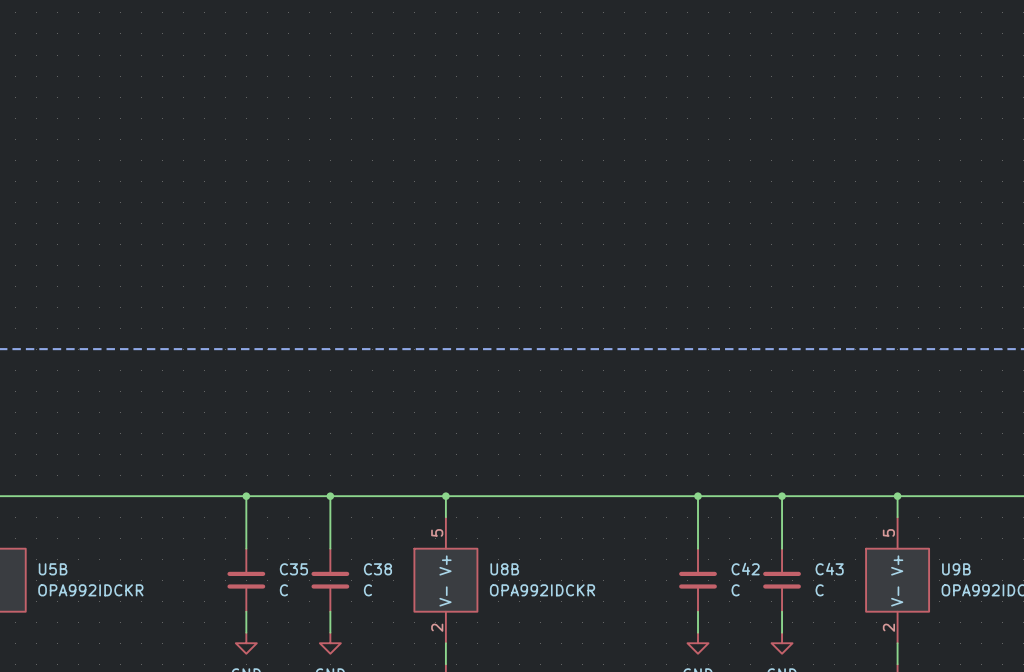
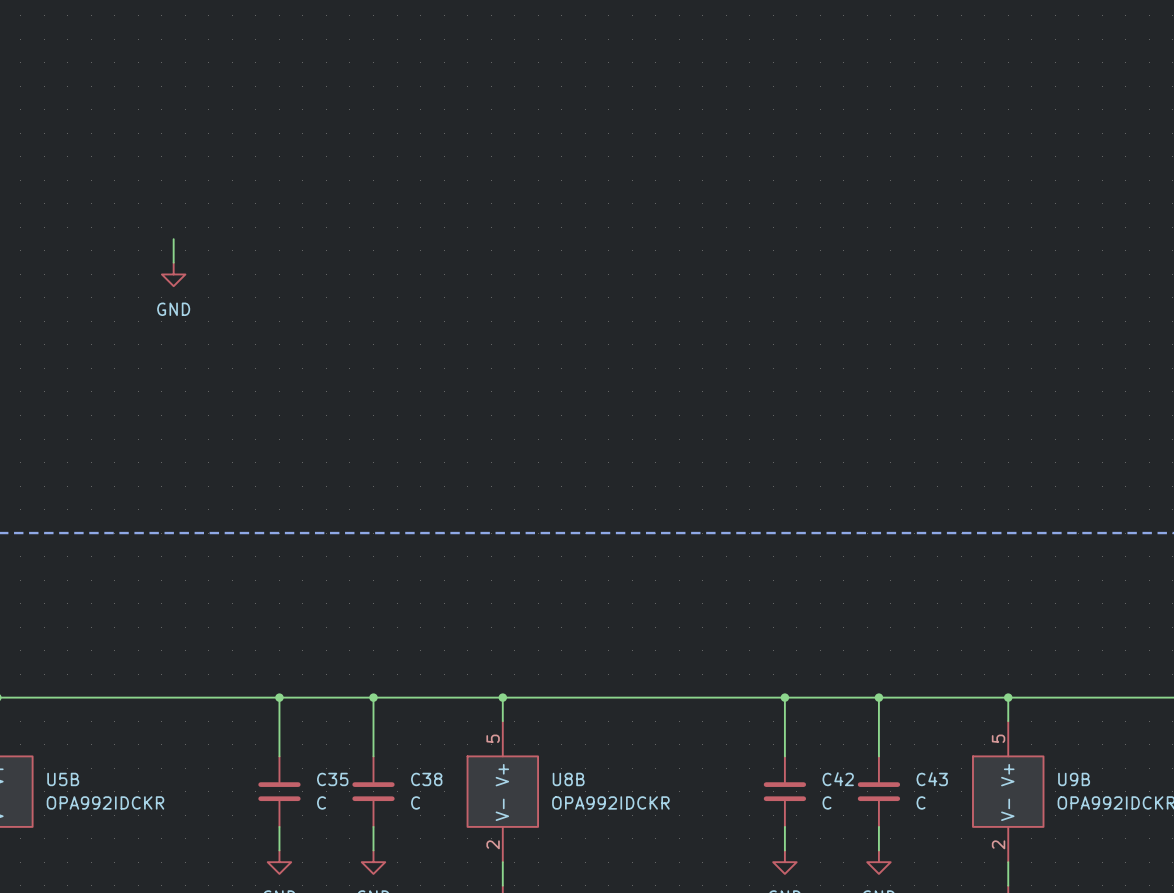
wire: none -> (173, 239) (173, 262)
power symbol: none -> GND (173, 274)

